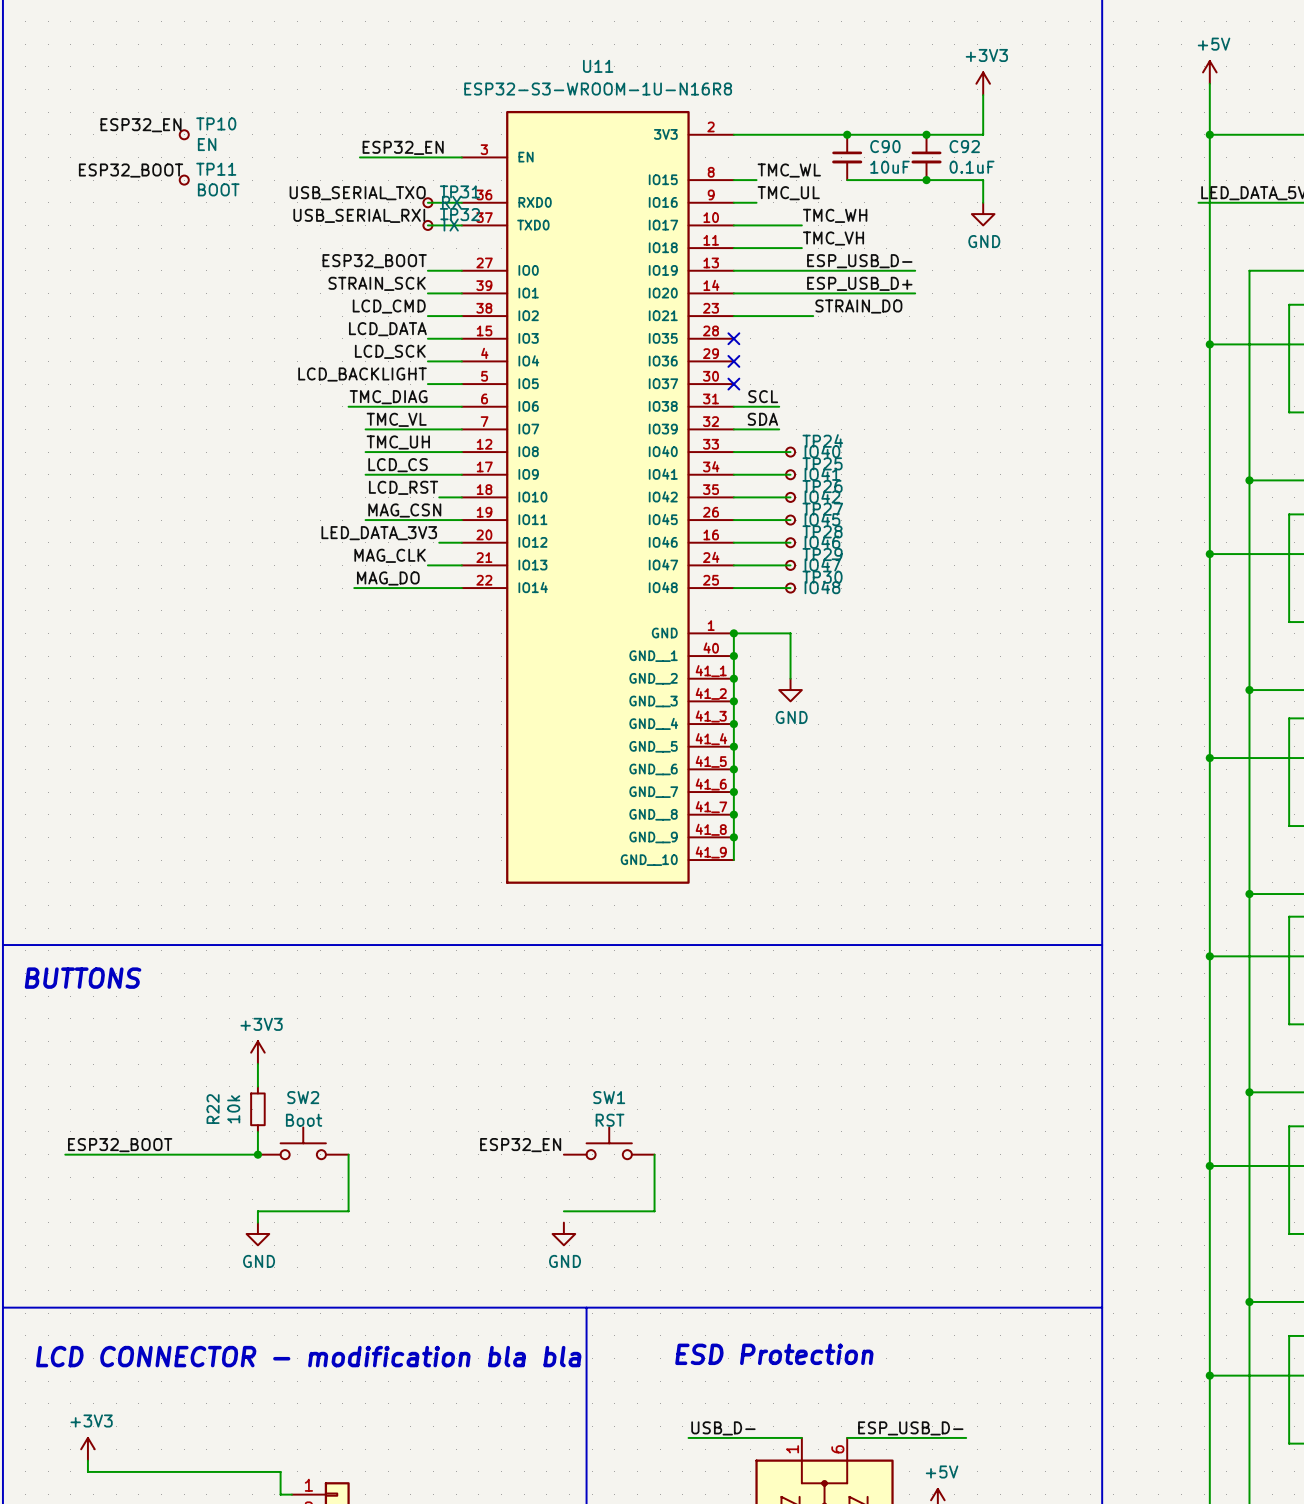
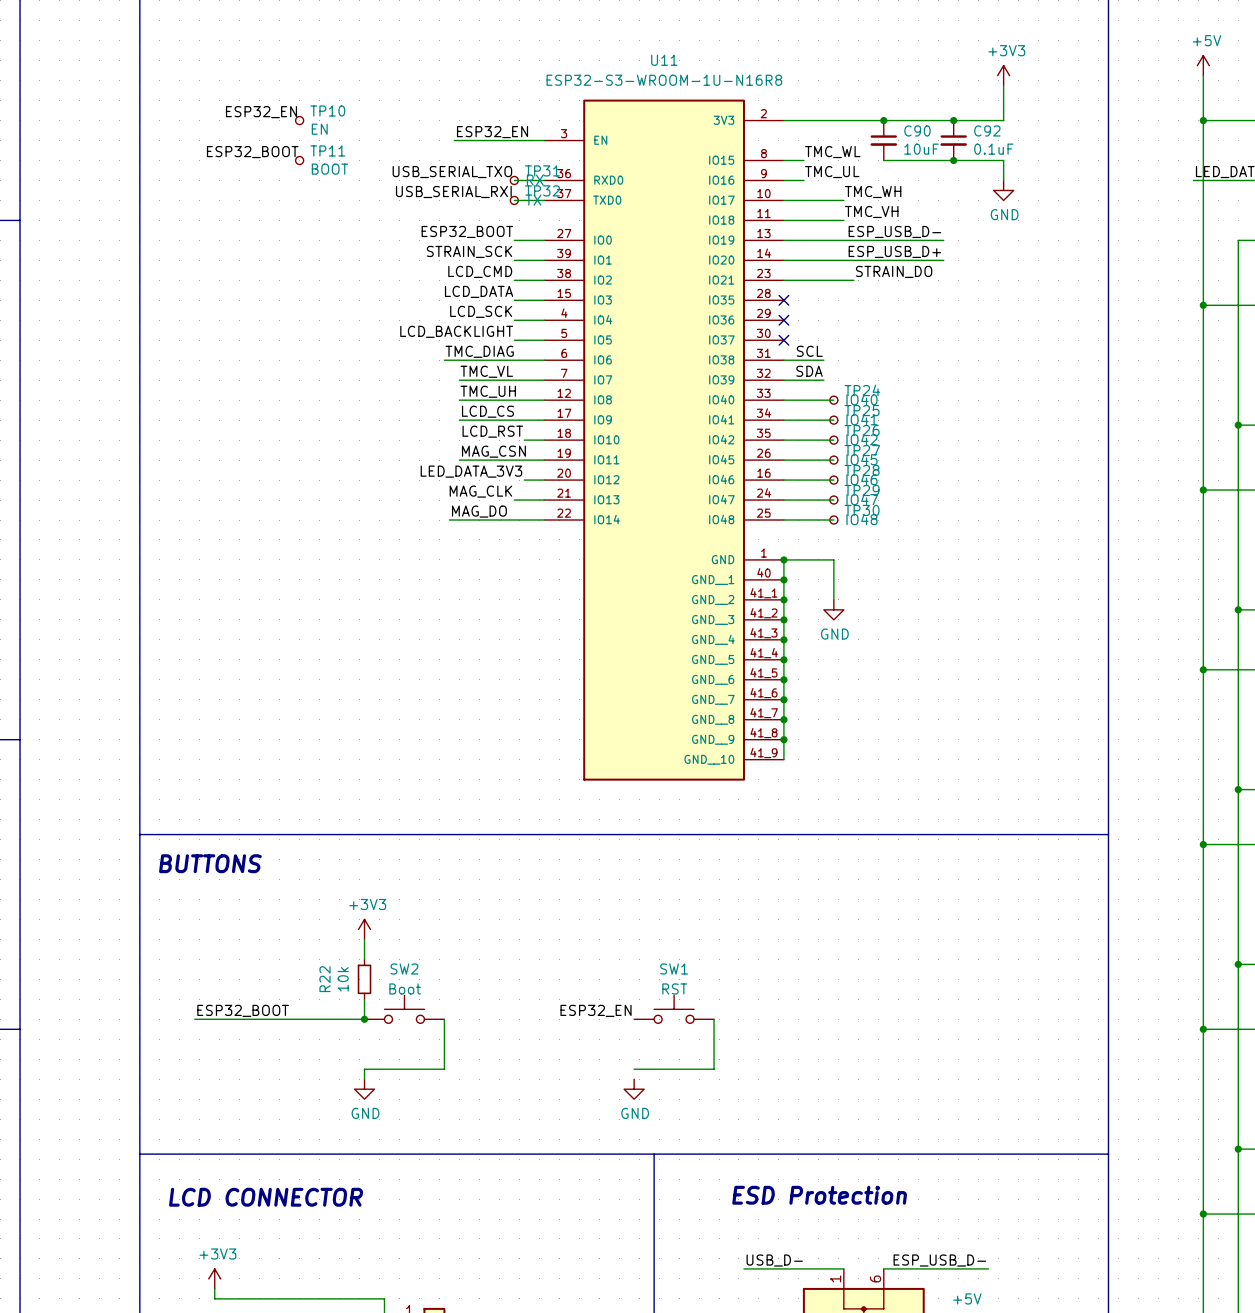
text: LCD CONNECTOR - modification bla bla (308, 1356) -> LCD CONNECTOR (266, 1197)

